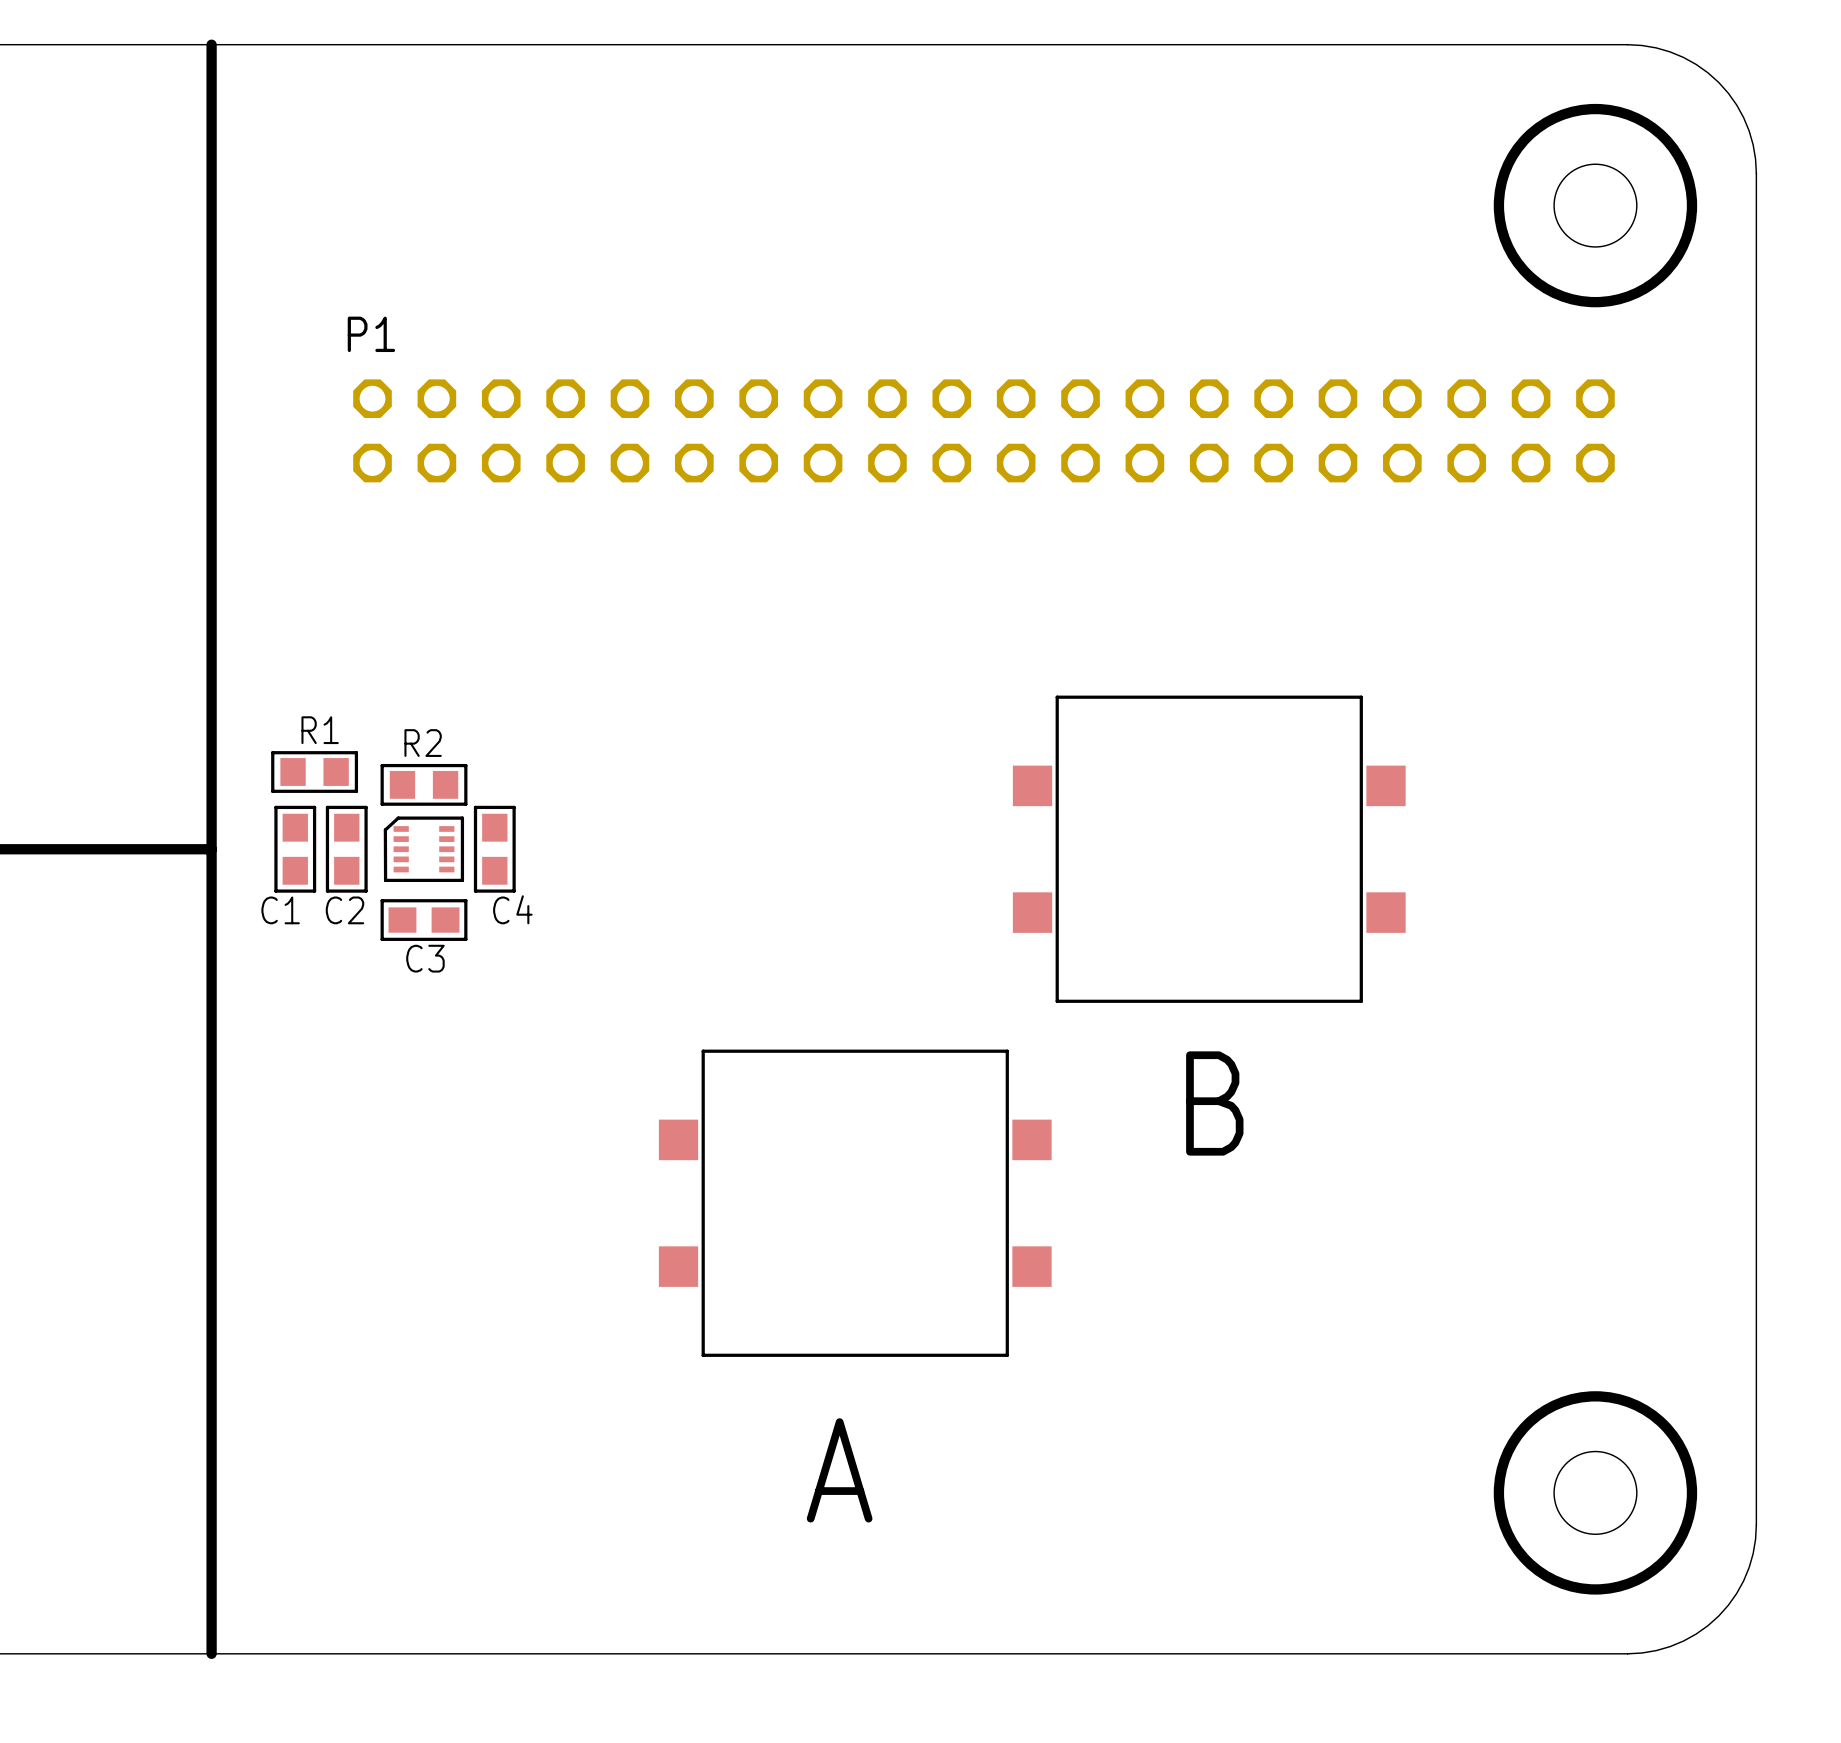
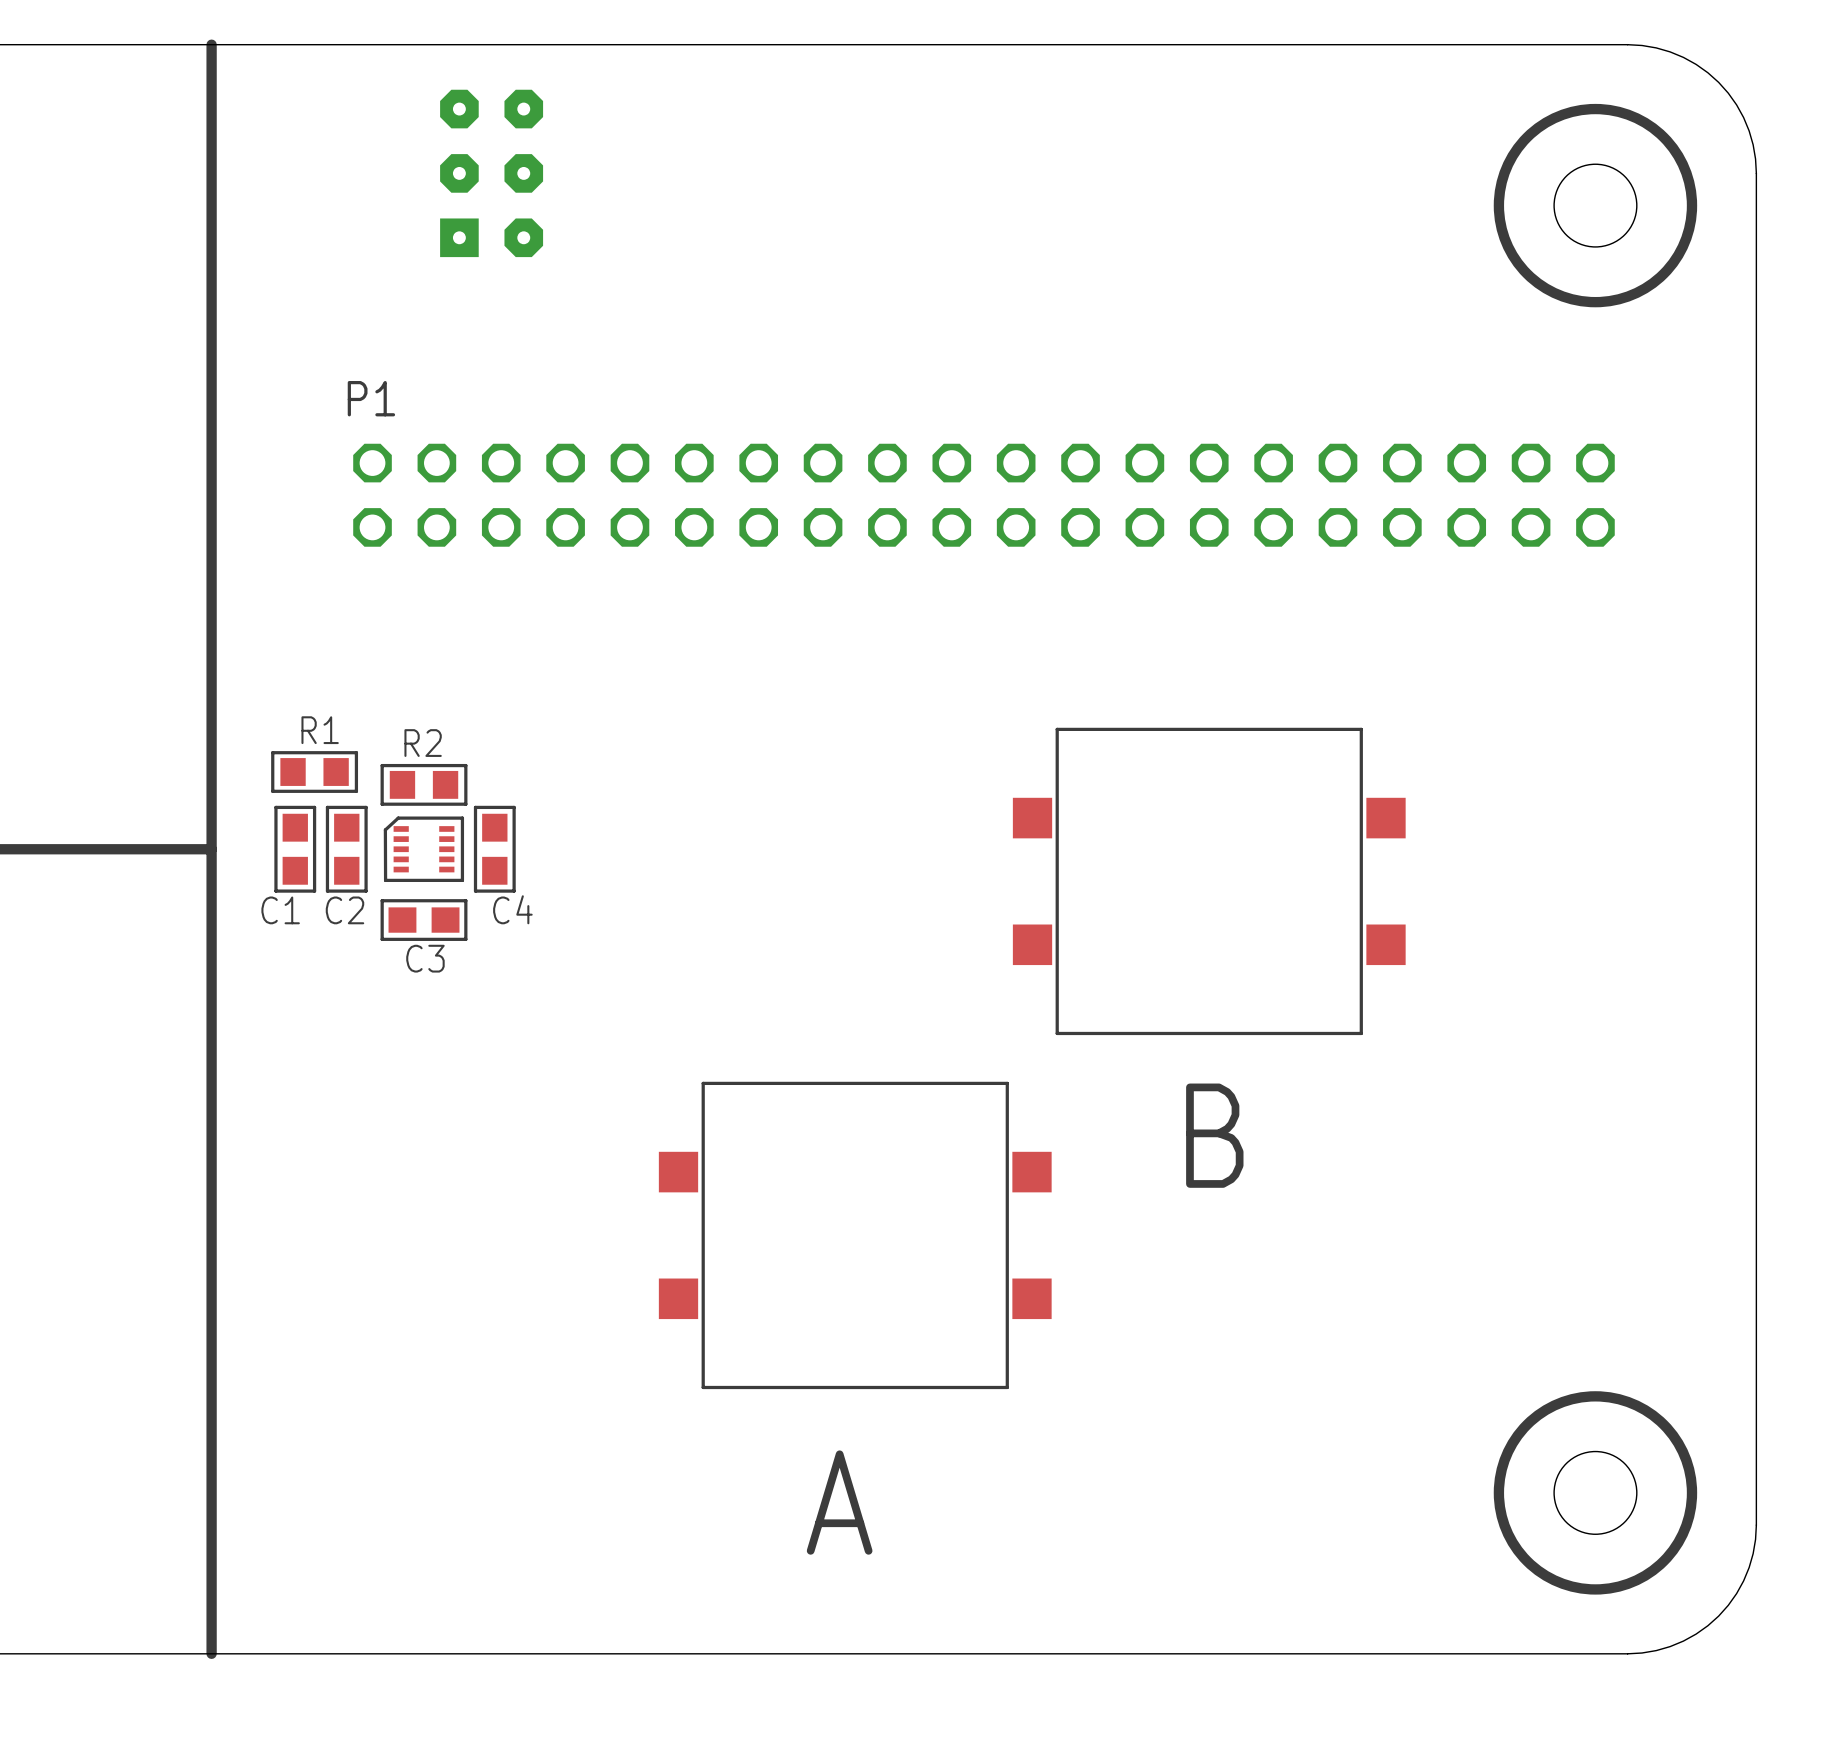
part: none -> (491, 173)
P1 position: (983, 430) -> (983, 495)
B position: (1209, 849) -> (1209, 881)
A position: (855, 1203) -> (855, 1235)

